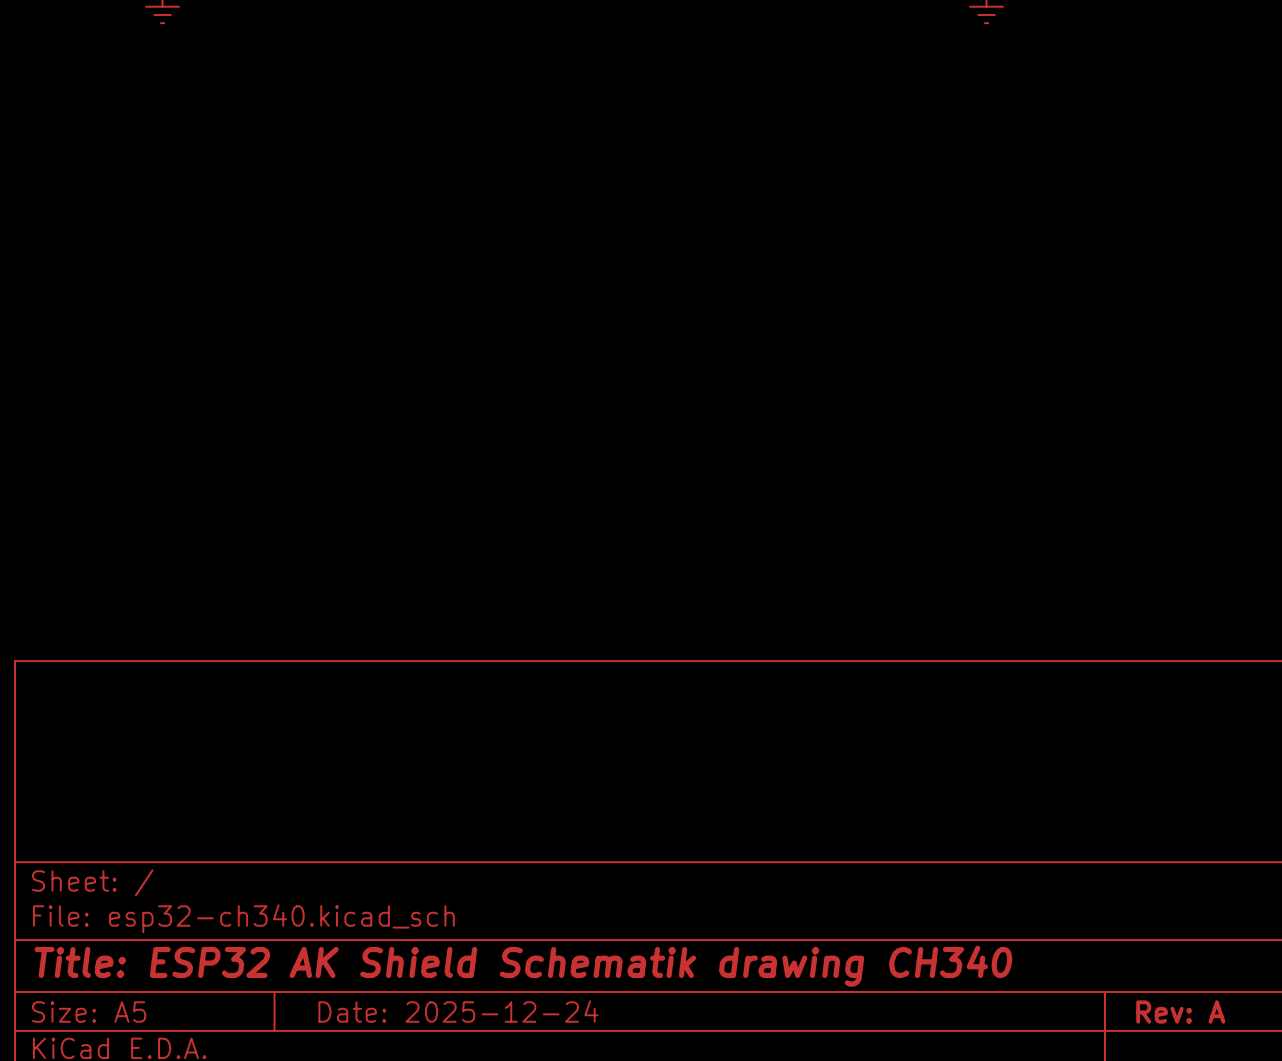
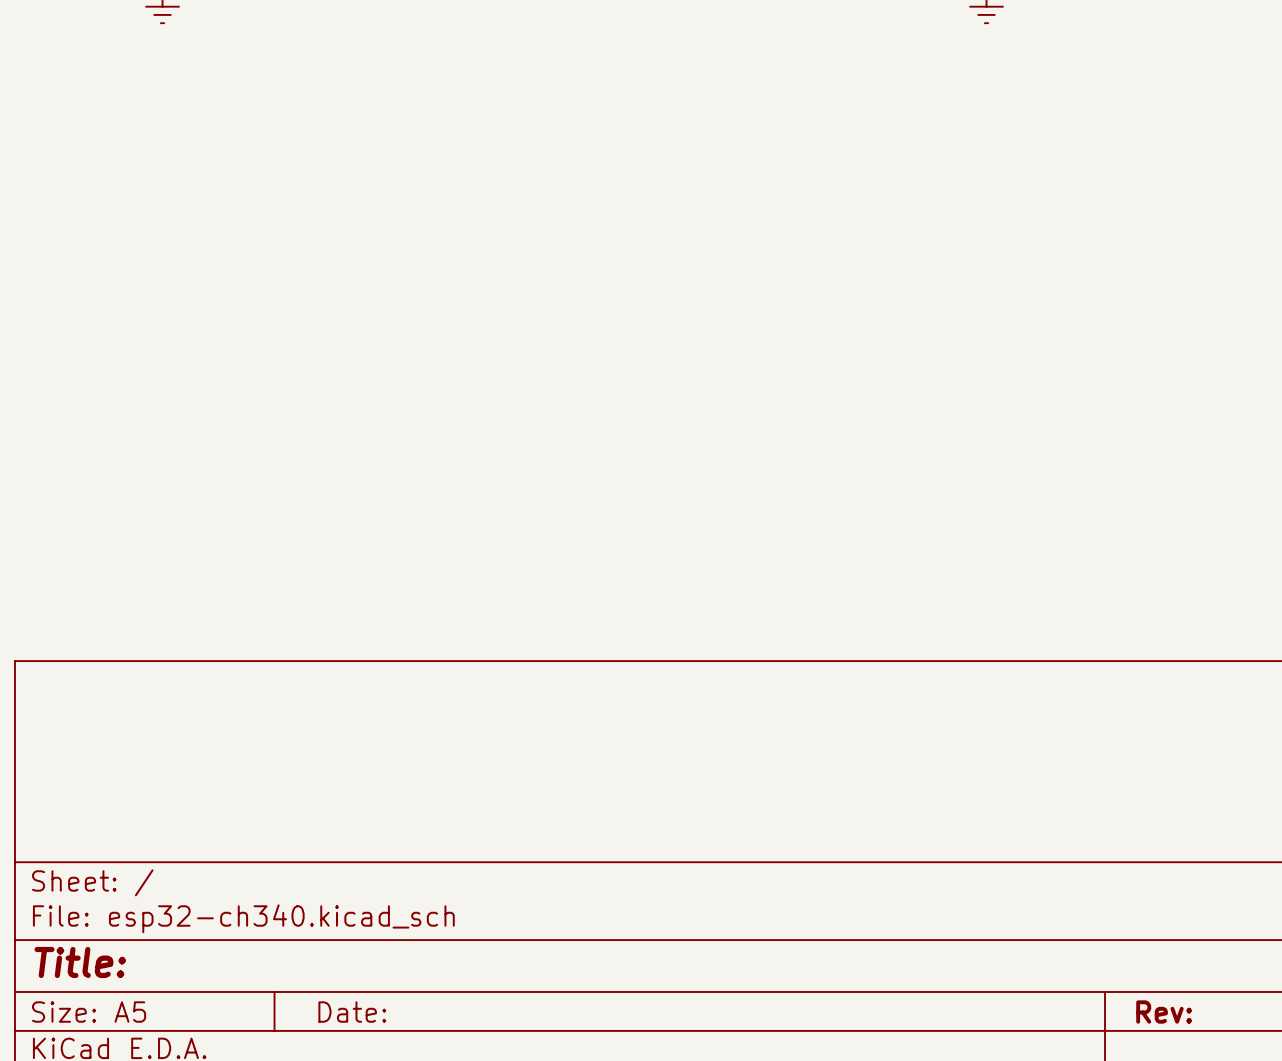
title block: Title: ESP32 AK Shield Schematik drawing CH340 (523, 966) -> Title: (80, 962)
title block: Date: 2025-12-24 (458, 1011) -> Date: (352, 1012)
title block: Rev: A (1180, 1012) -> Rev: (1164, 1012)

